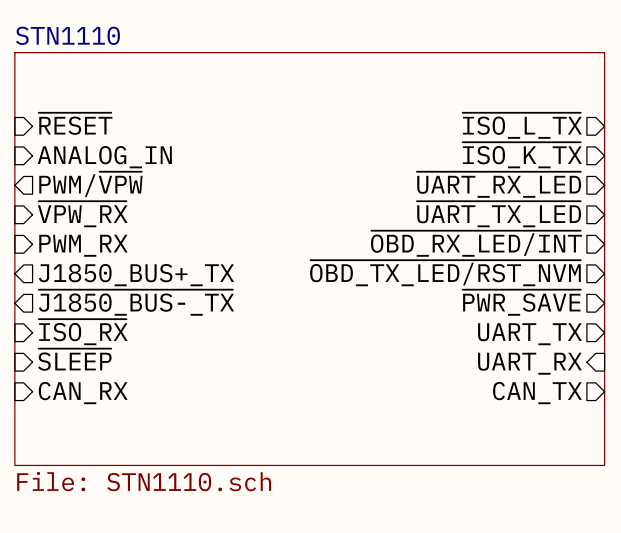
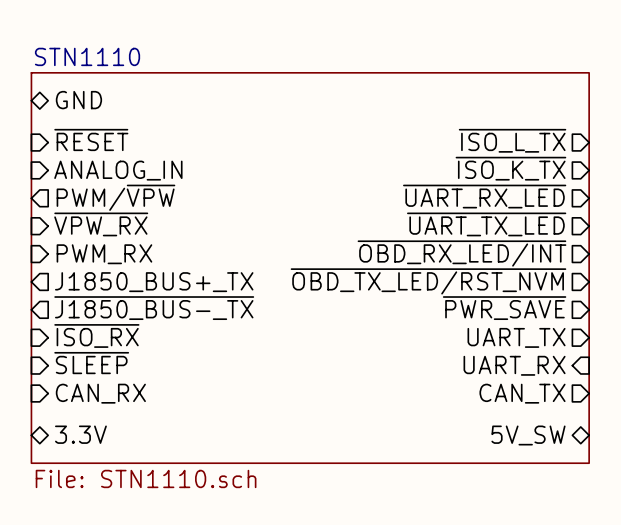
sheet pin: none -> GND (78, 100)
sheet pin: none -> 3.3V (80, 434)
sheet pin: none -> 5V_SW (528, 435)

